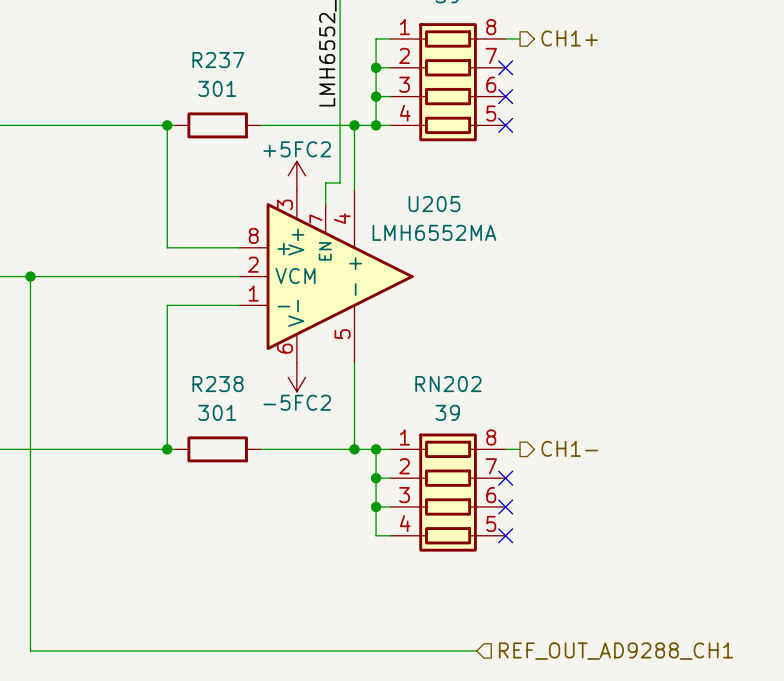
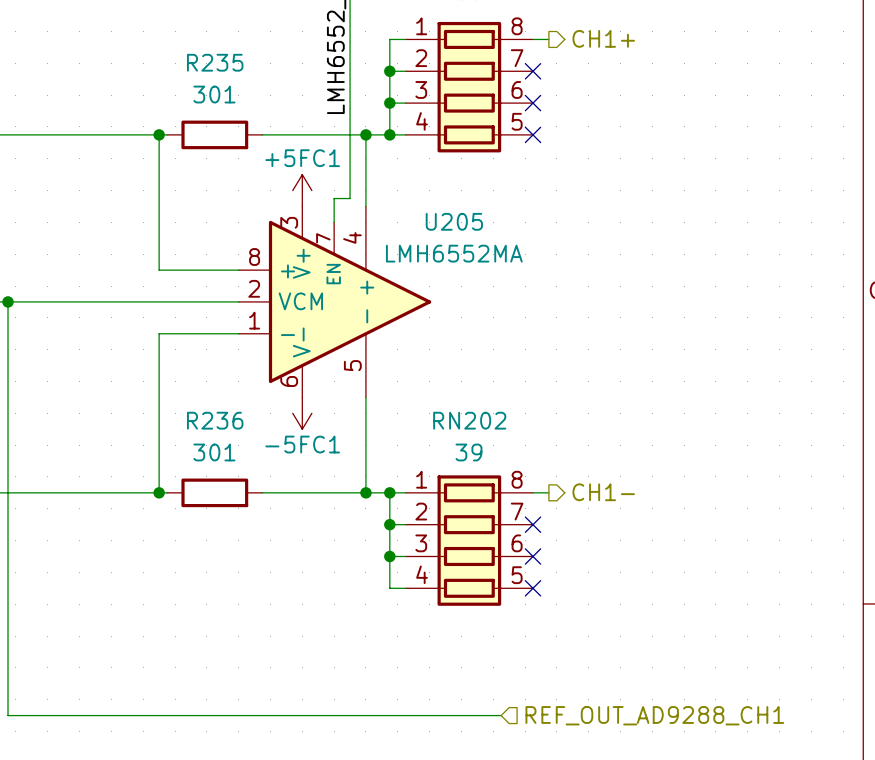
R237 name: R237 (218, 60) -> R235 (215, 62)
power symbol: +5FC2 (296, 175) -> +5FC1 (302, 190)
power symbol: -5FC2 (296, 377) -> -5FC1 (302, 413)
R238 name: R238 (218, 384) -> R236 (215, 420)

